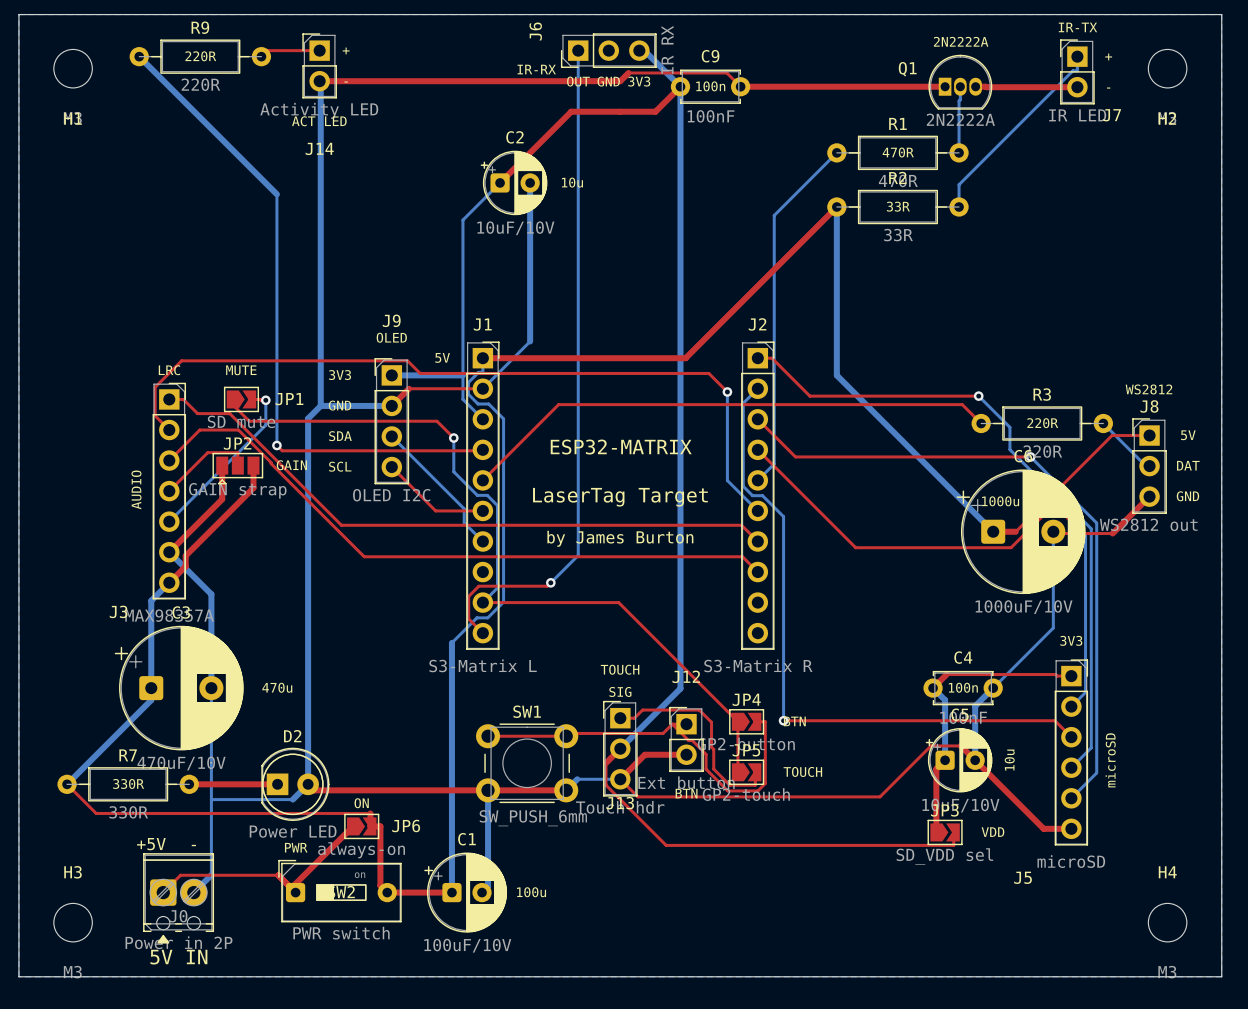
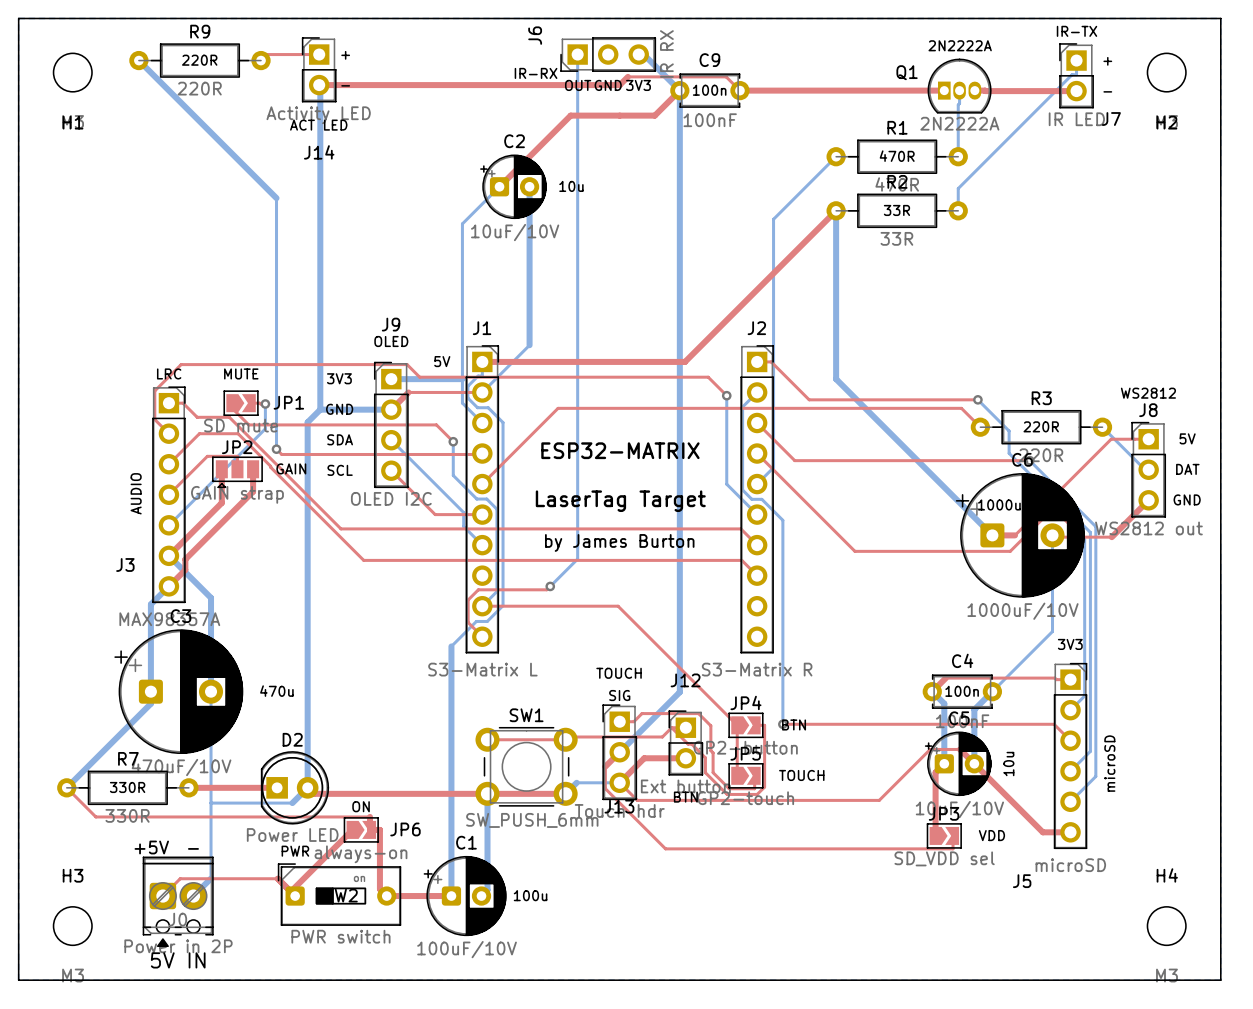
J3 name position: J3 (118, 611) -> J3 (125, 565)

